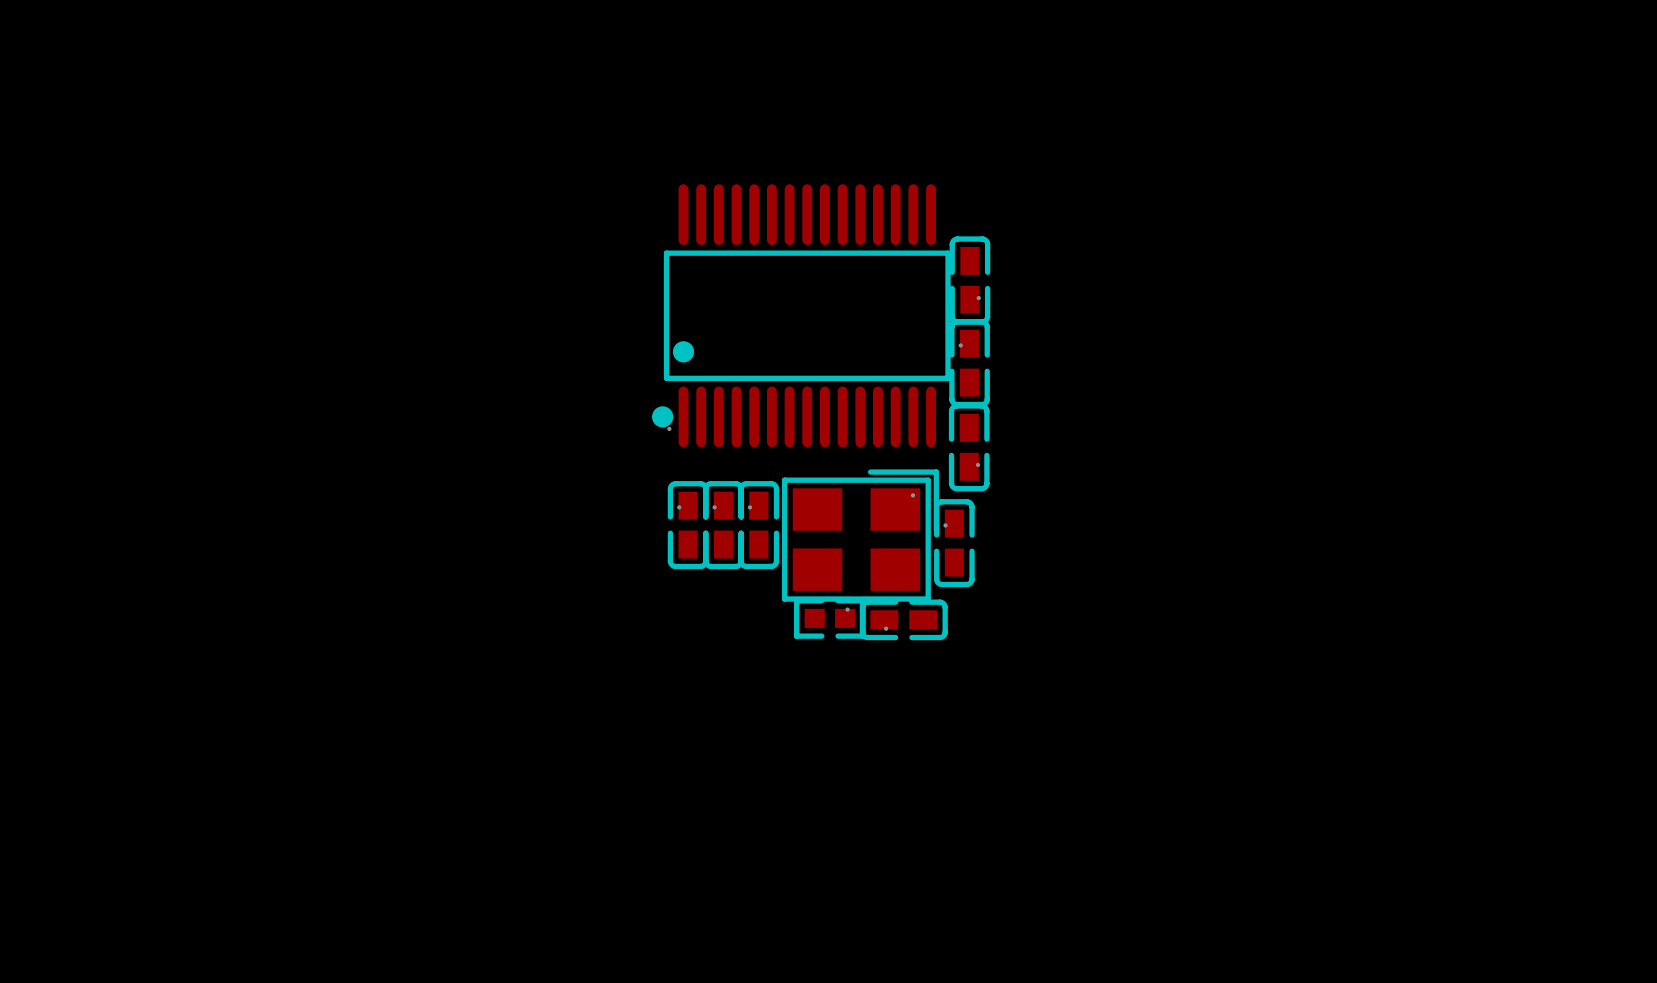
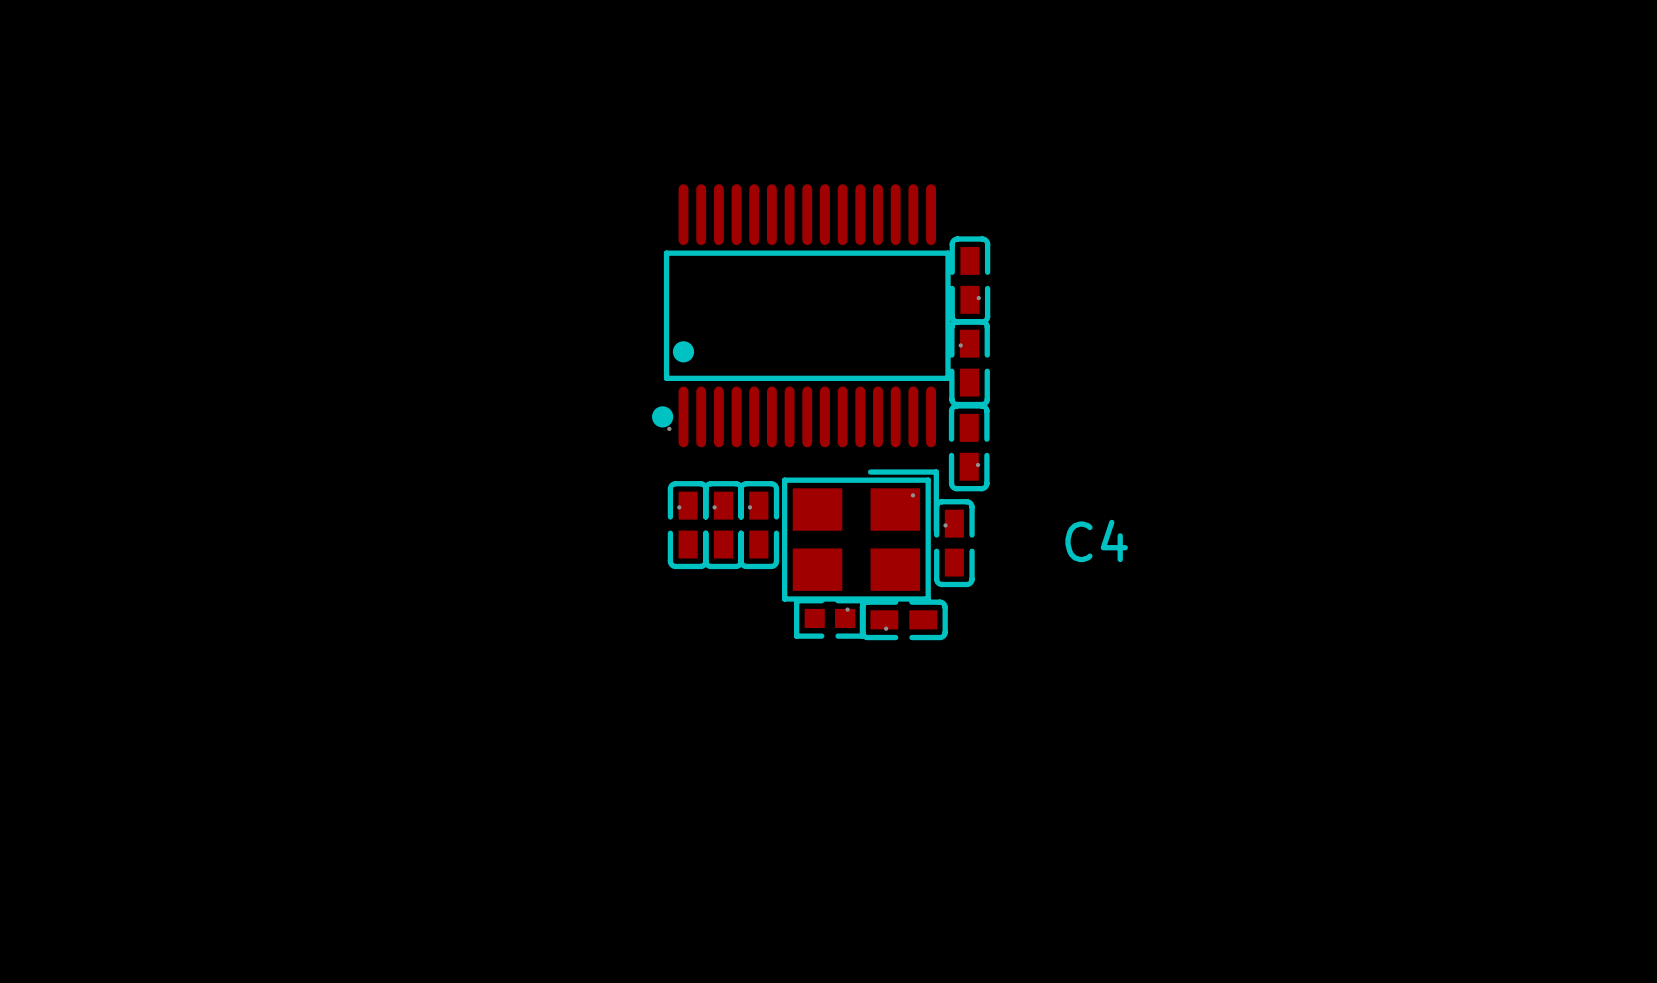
C4 name: none -> C4 (1096, 540)

